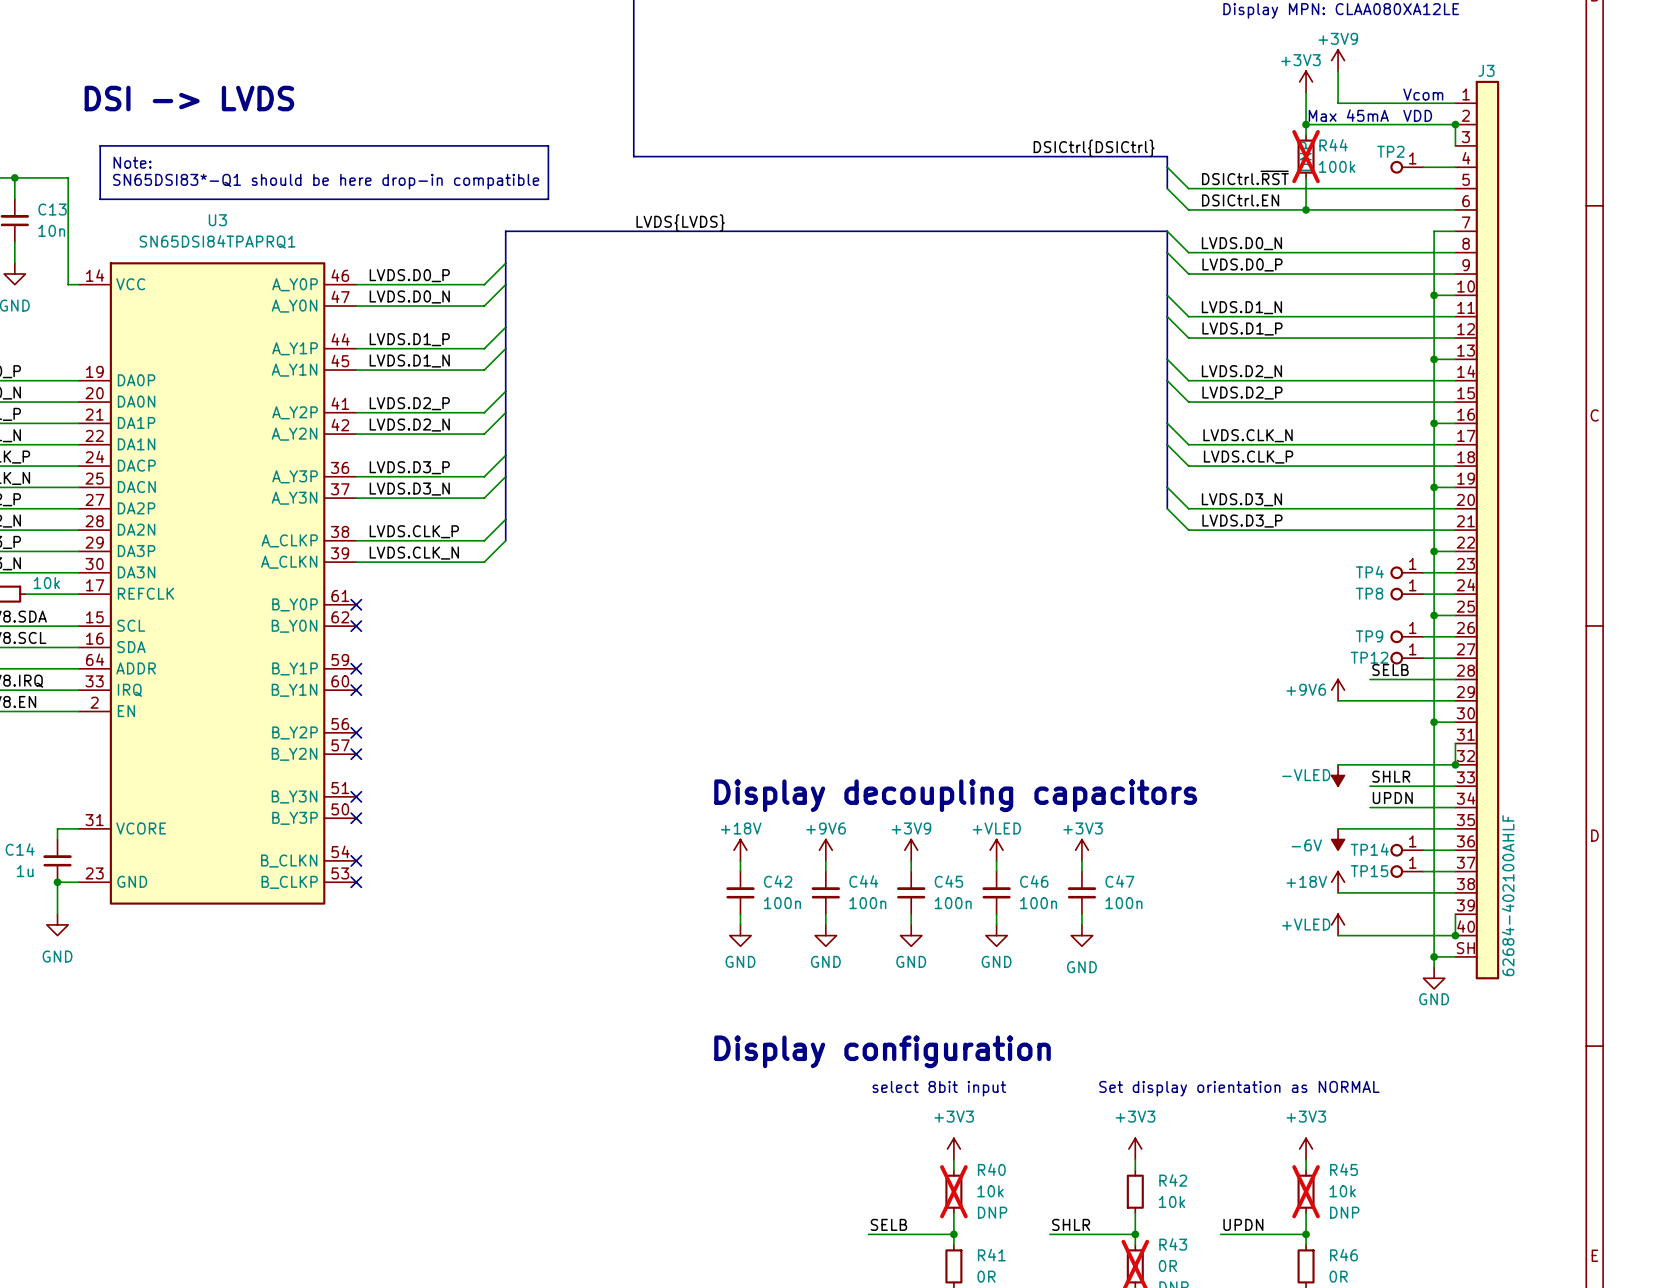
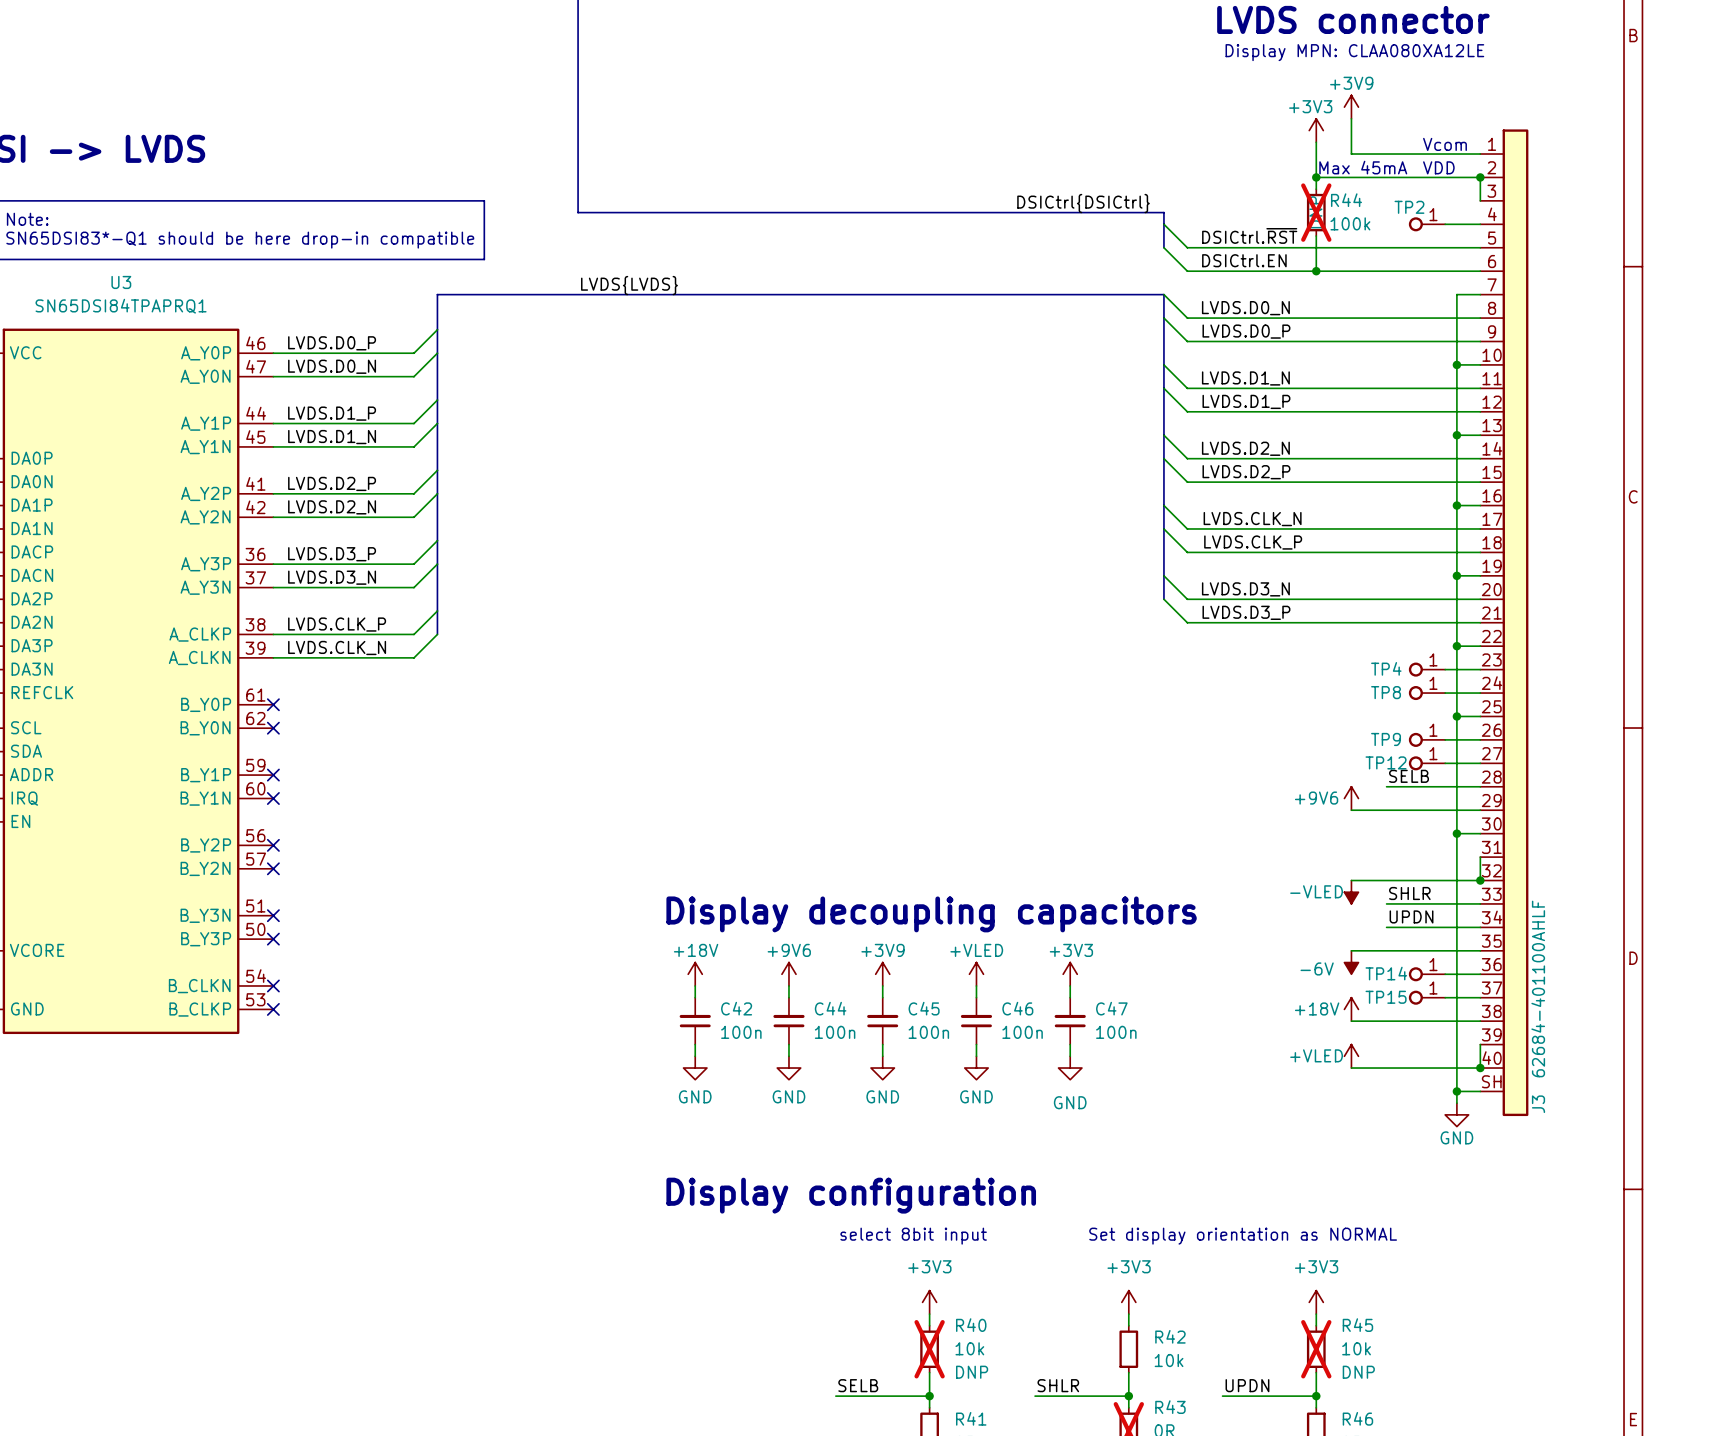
J3 name rotation: 0° (1486, 70) -> 90° counterclockwise (1538, 1104)
J3 name position: J3 (1486, 70) -> J3 (1538, 1104)
J3 text: 62684-402100AHLF (1508, 895) -> 62684-401100AHLF (1538, 988)

